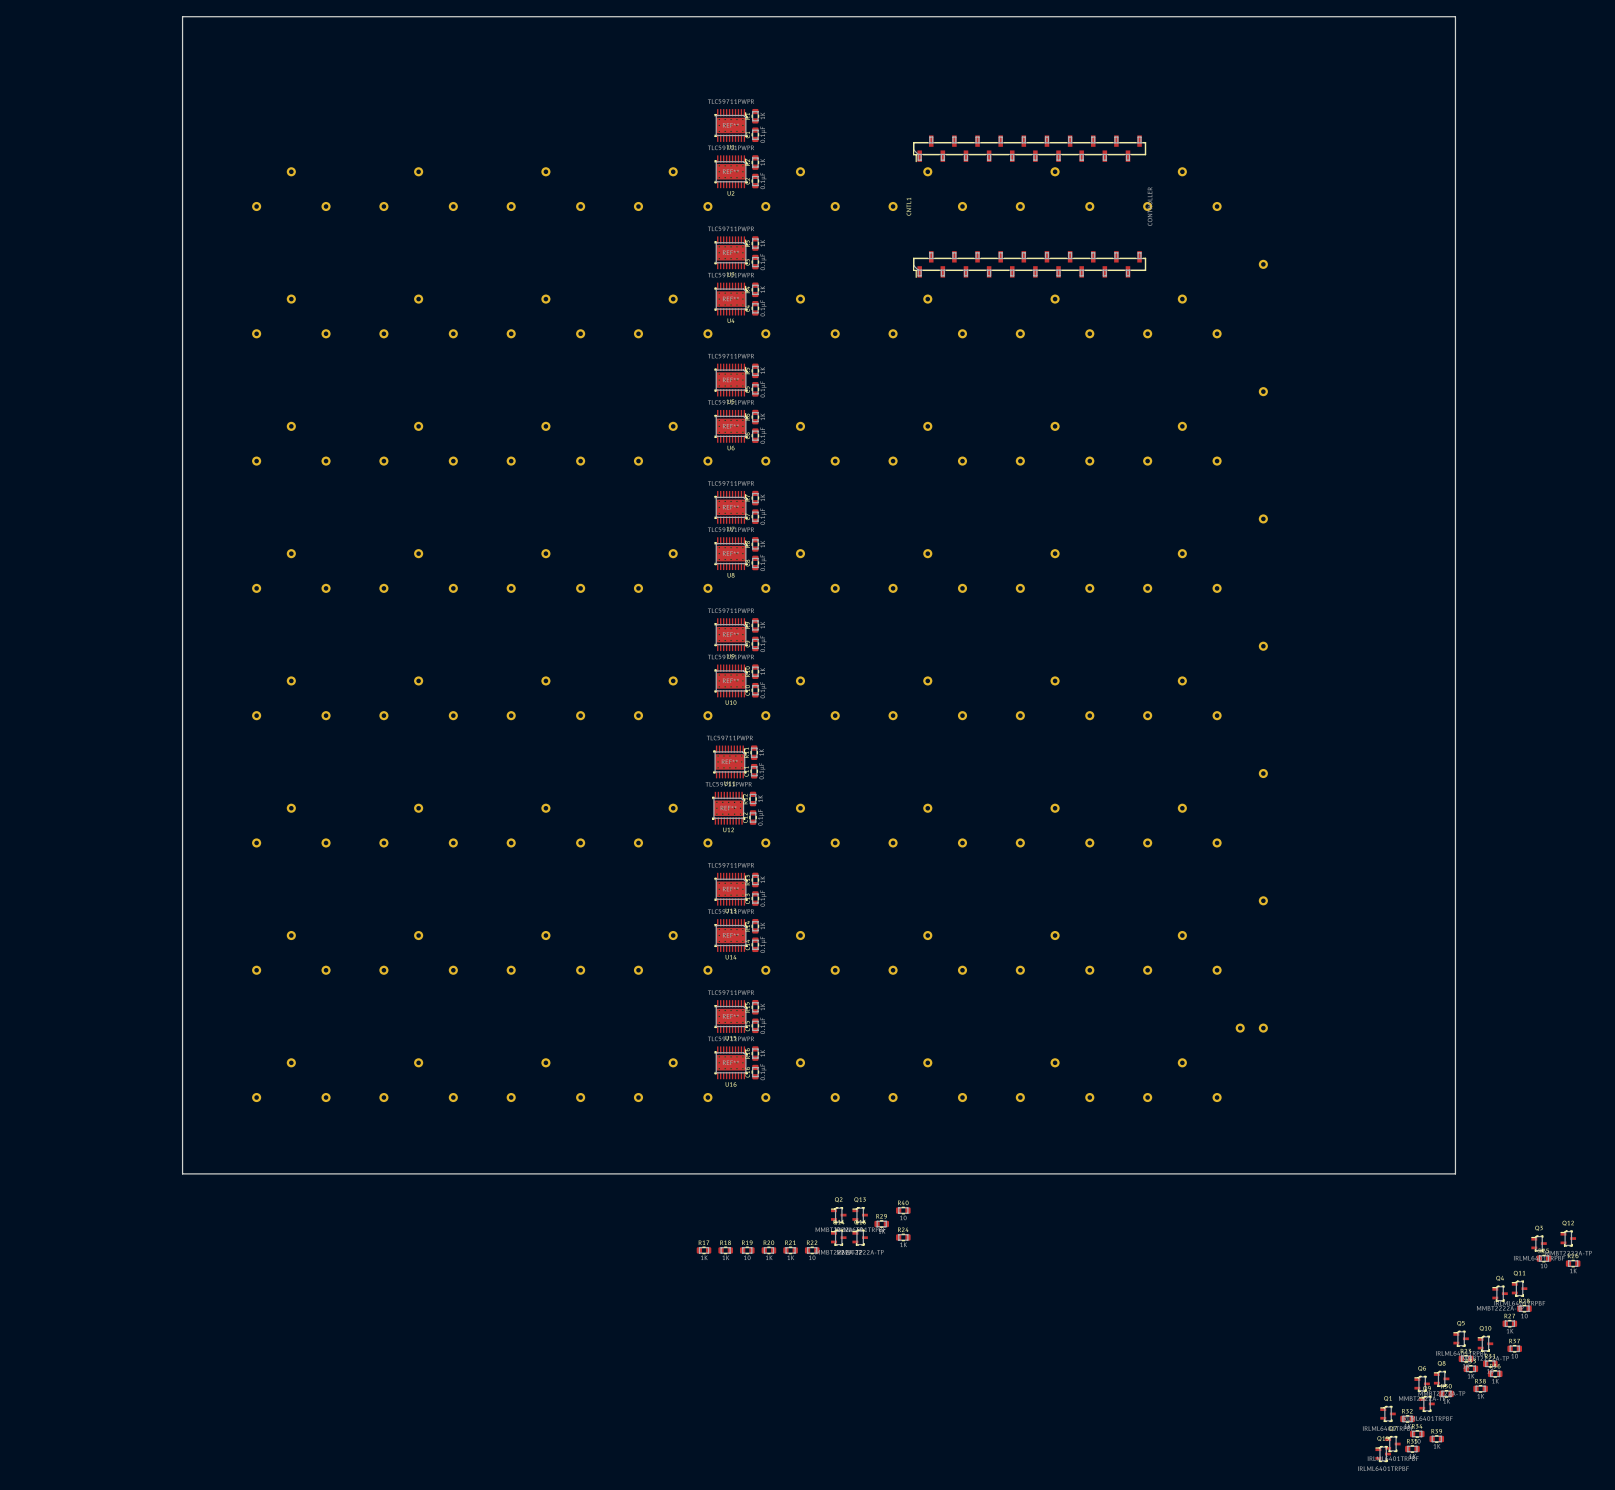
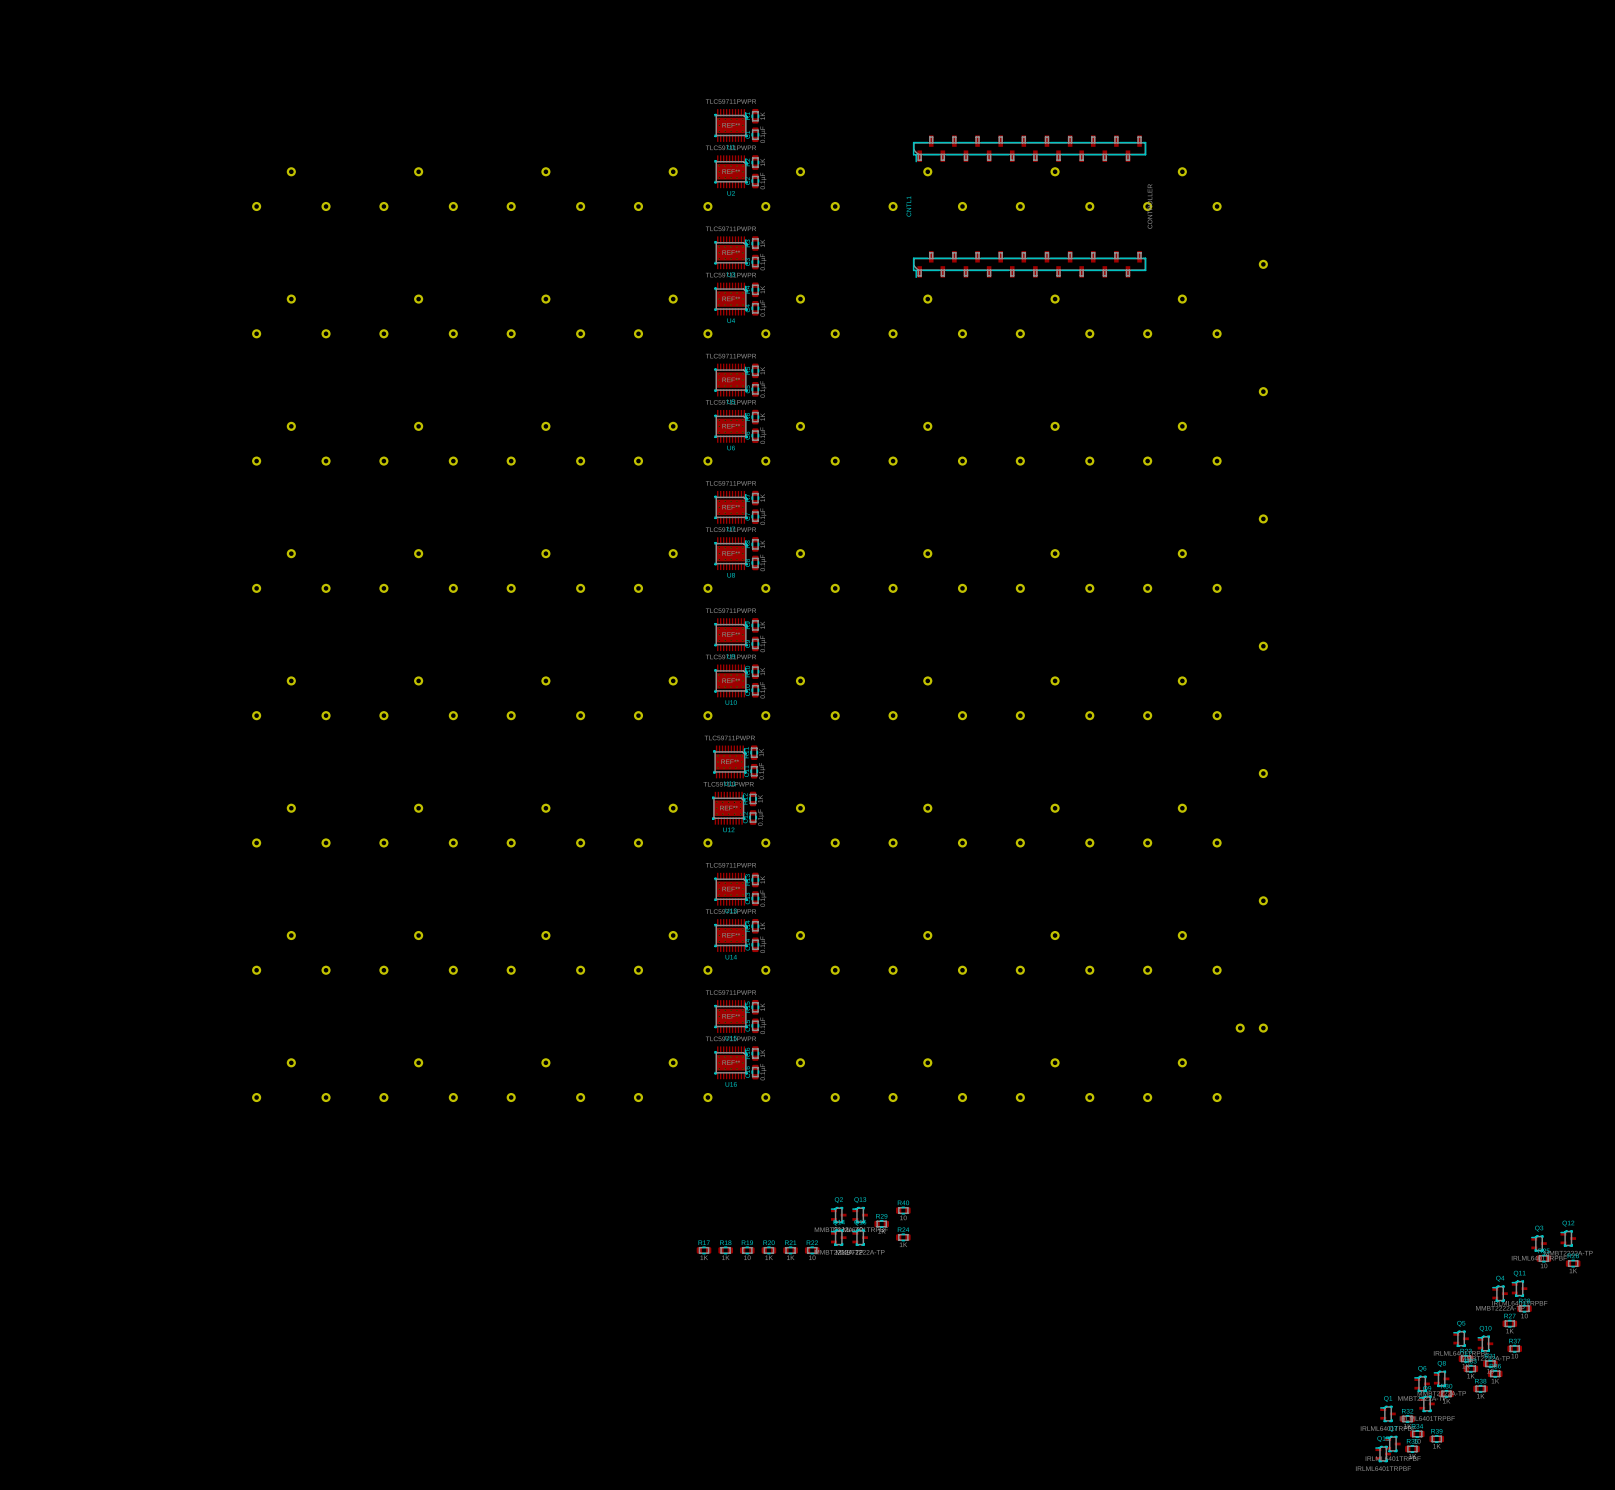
board edge: (182, 16) (182, 1173) (1455, 1173) (1455, 16) (182, 16) -> none

